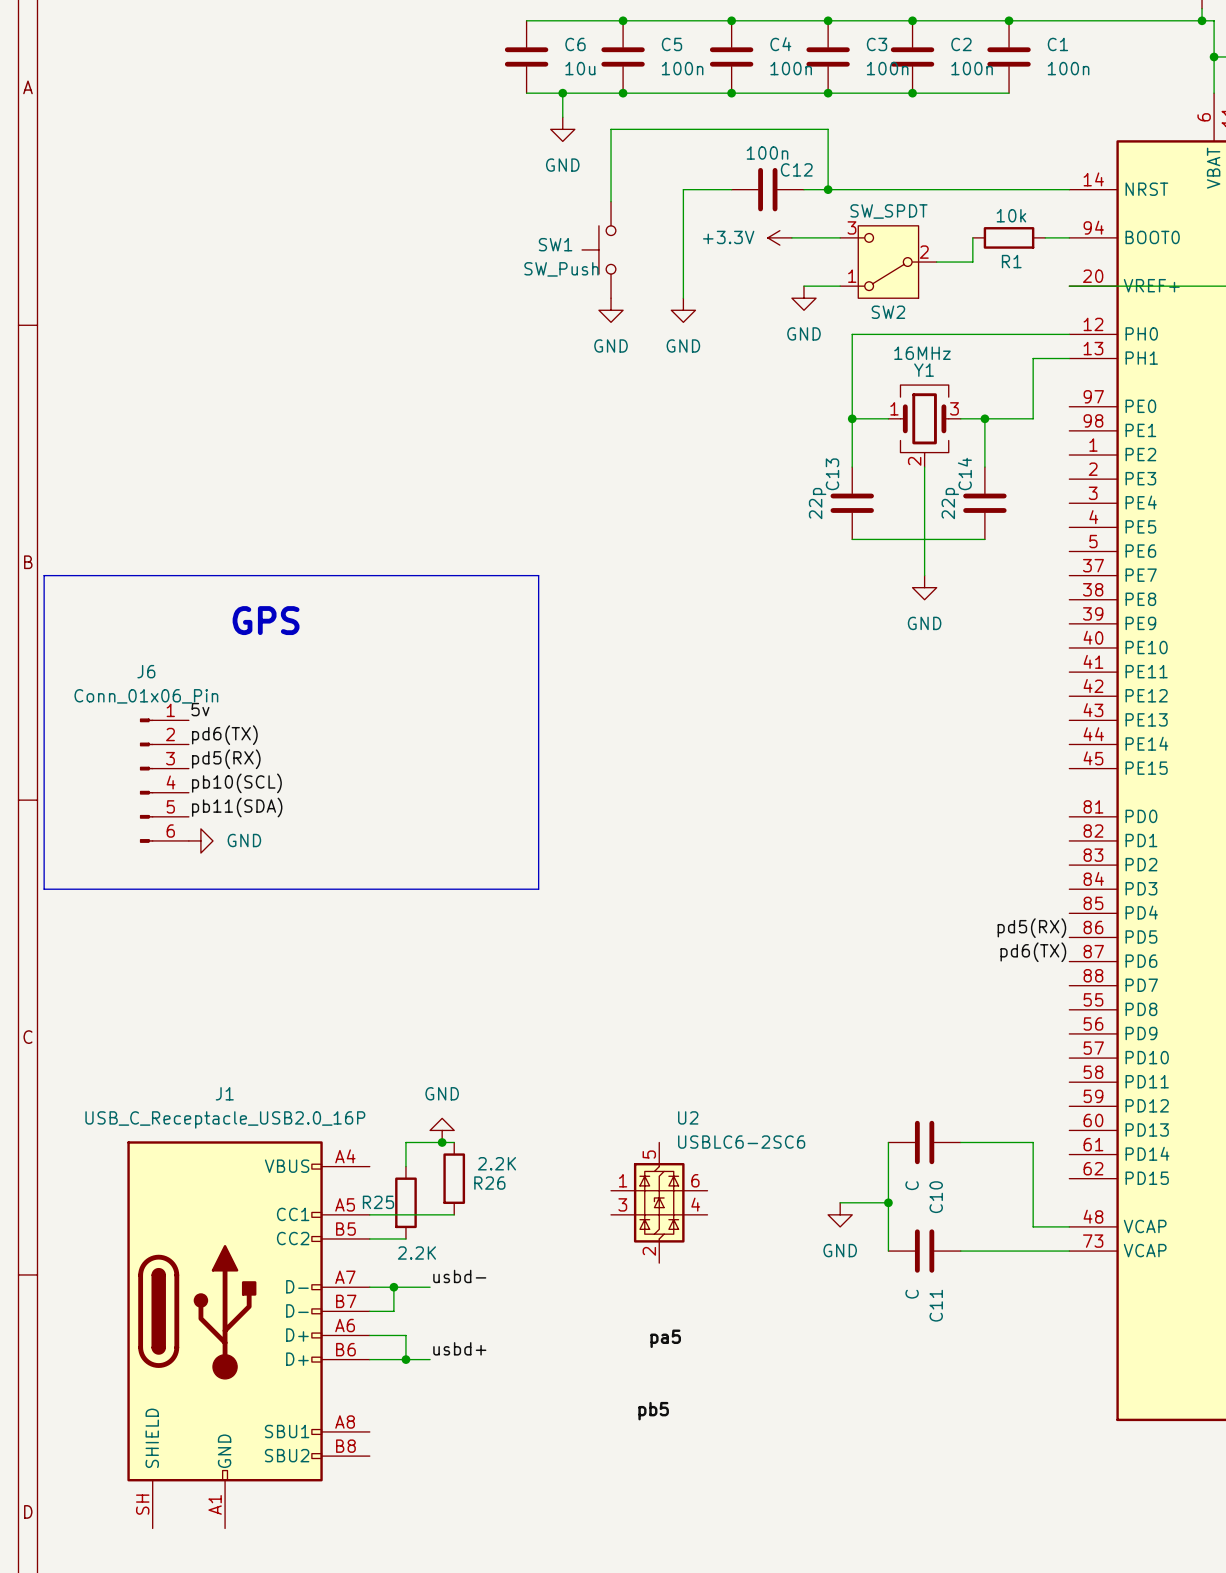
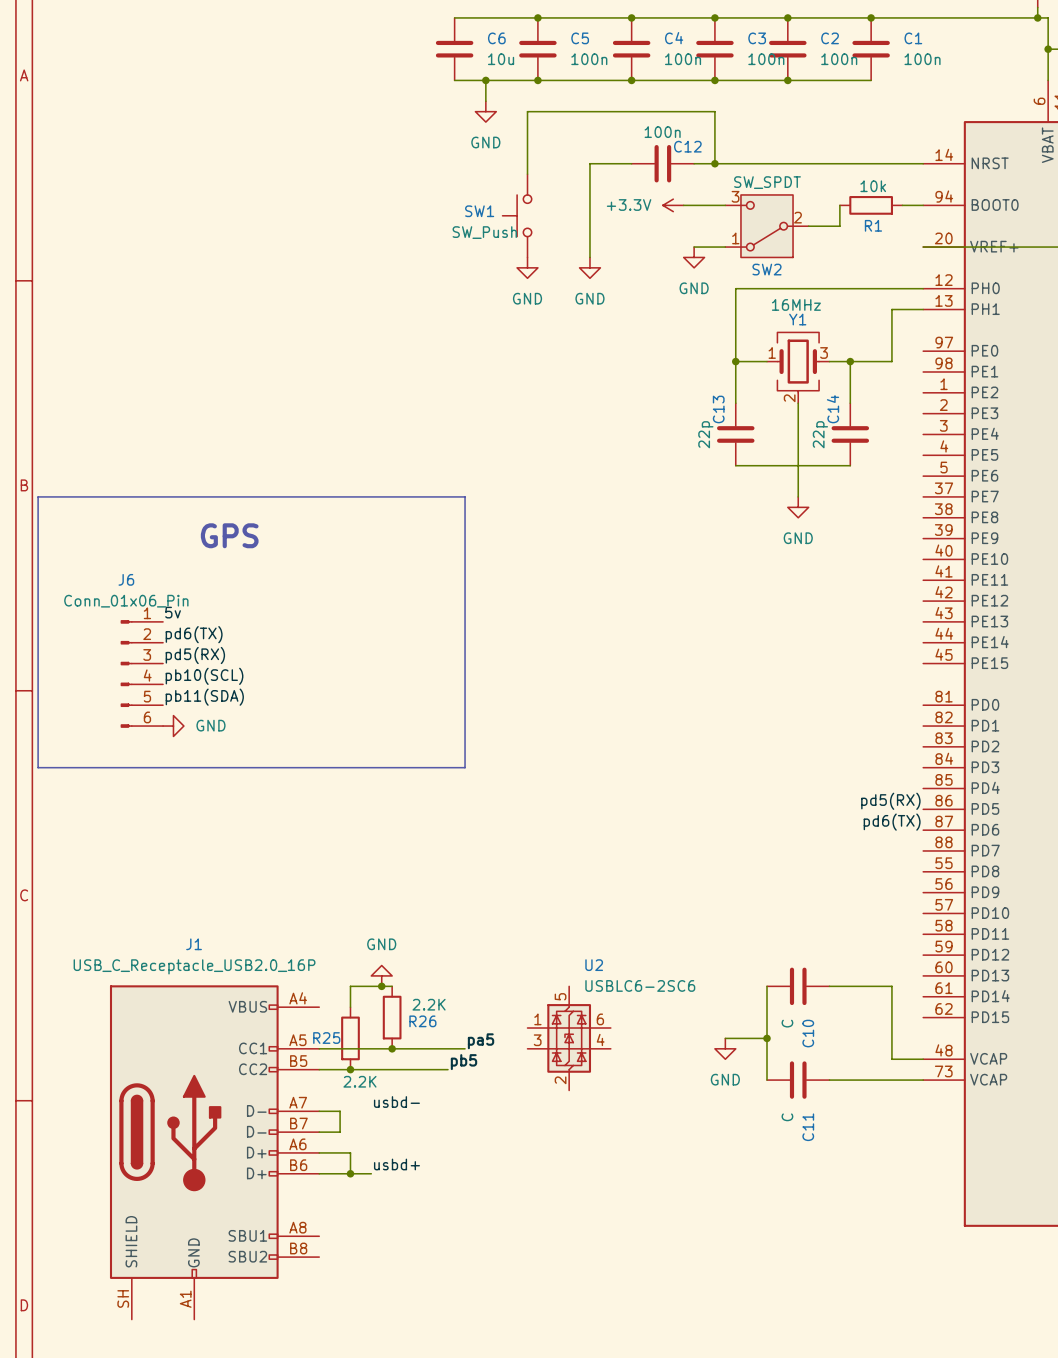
wire: none -> (392, 1048) (465, 1048)
junction: none -> (392, 1048)
wire: none -> (350, 1069) (448, 1069)
junction: none -> (350, 1069)
wire: (393, 1287) (430, 1287) -> none
junction: (393, 1287) -> none
label position: pa5 (665, 1338) -> pa5 (481, 1041)
label position: pb5 (653, 1411) -> pb5 (464, 1062)

